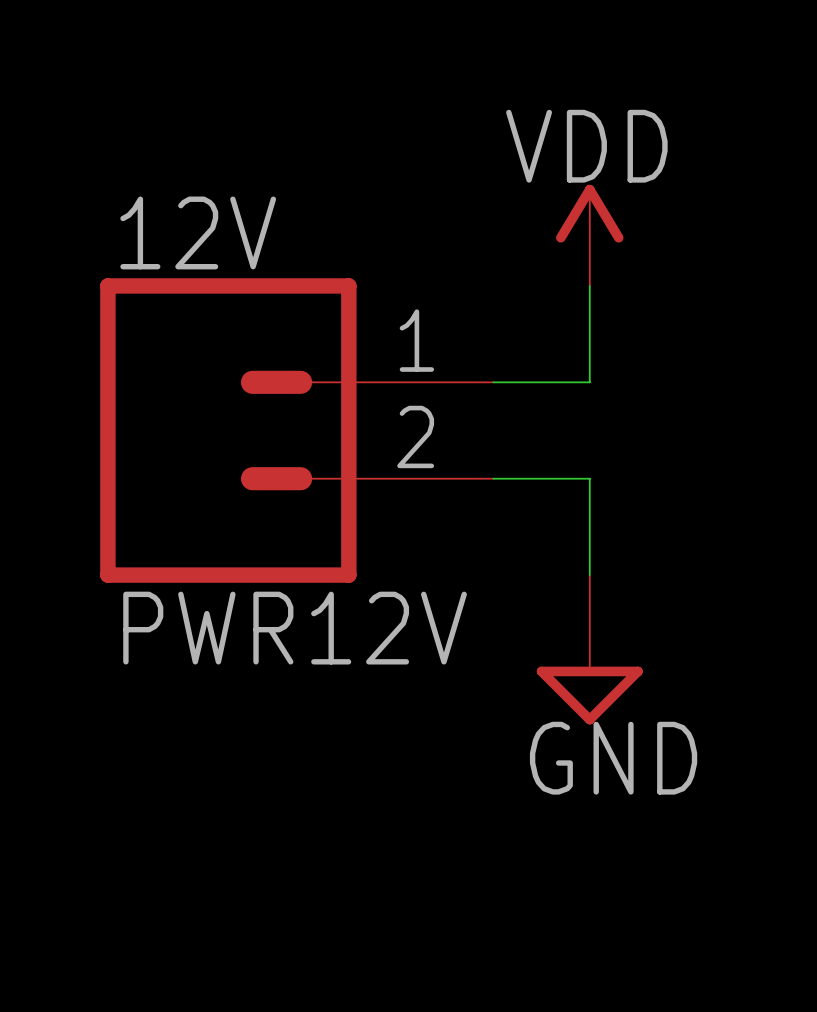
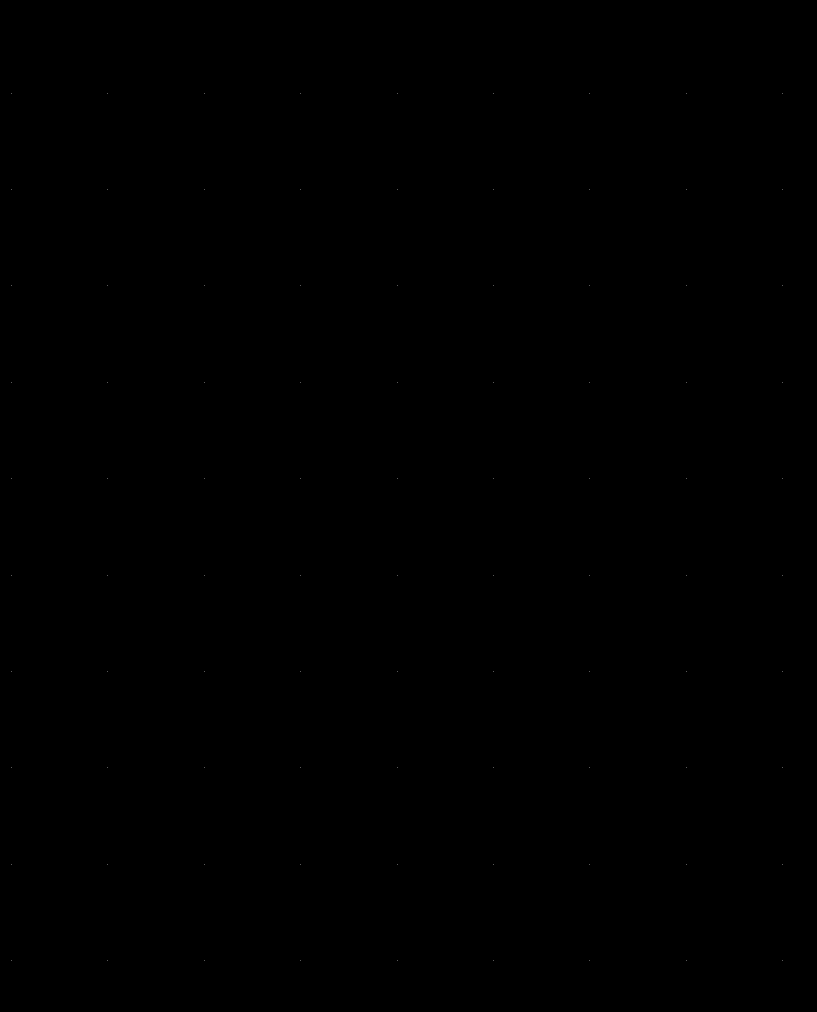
power symbol: VDD (589, 235) -> none
wire: (589, 285) (589, 382) (493, 382) -> none
PWR12V: 12V (296, 430) -> none
wire: (493, 478) (589, 478) (589, 575) -> none
power symbol: GND (589, 649) -> none

